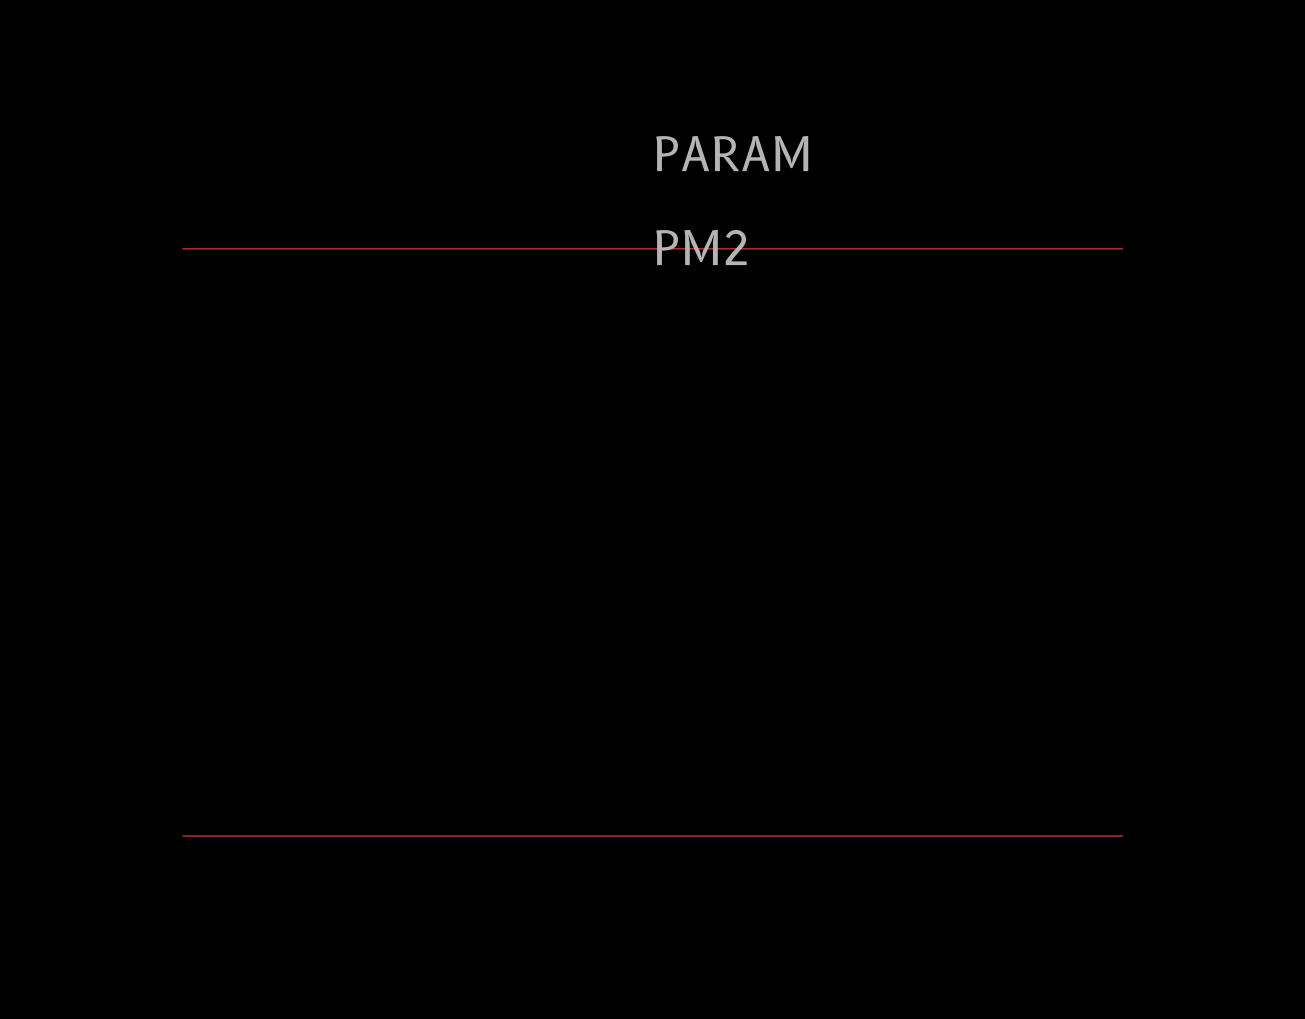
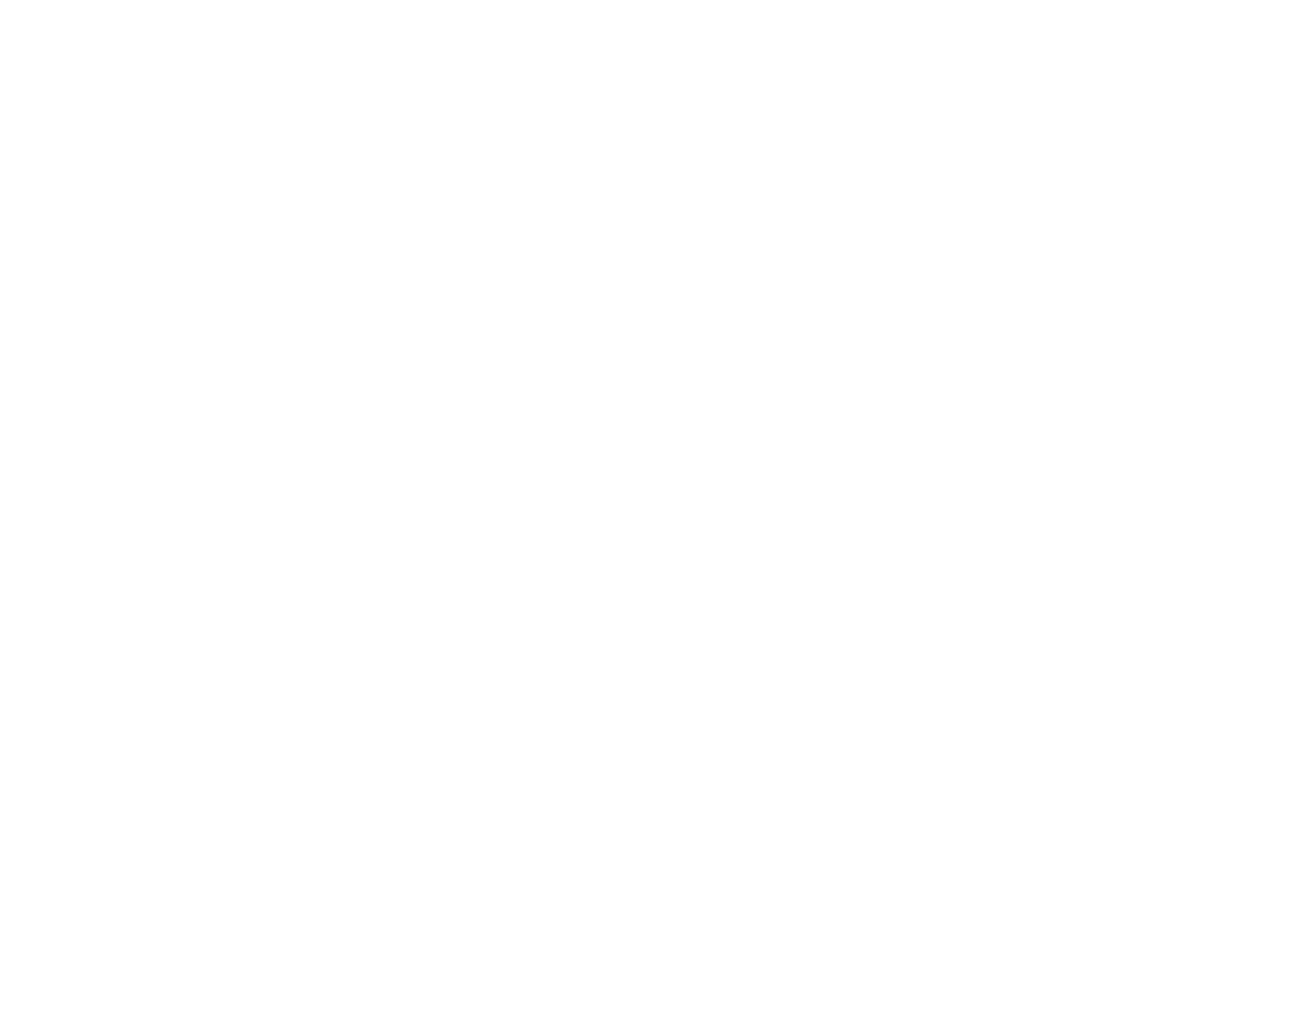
PM2: PARAM (652, 248) -> none
part: (652, 836) -> none

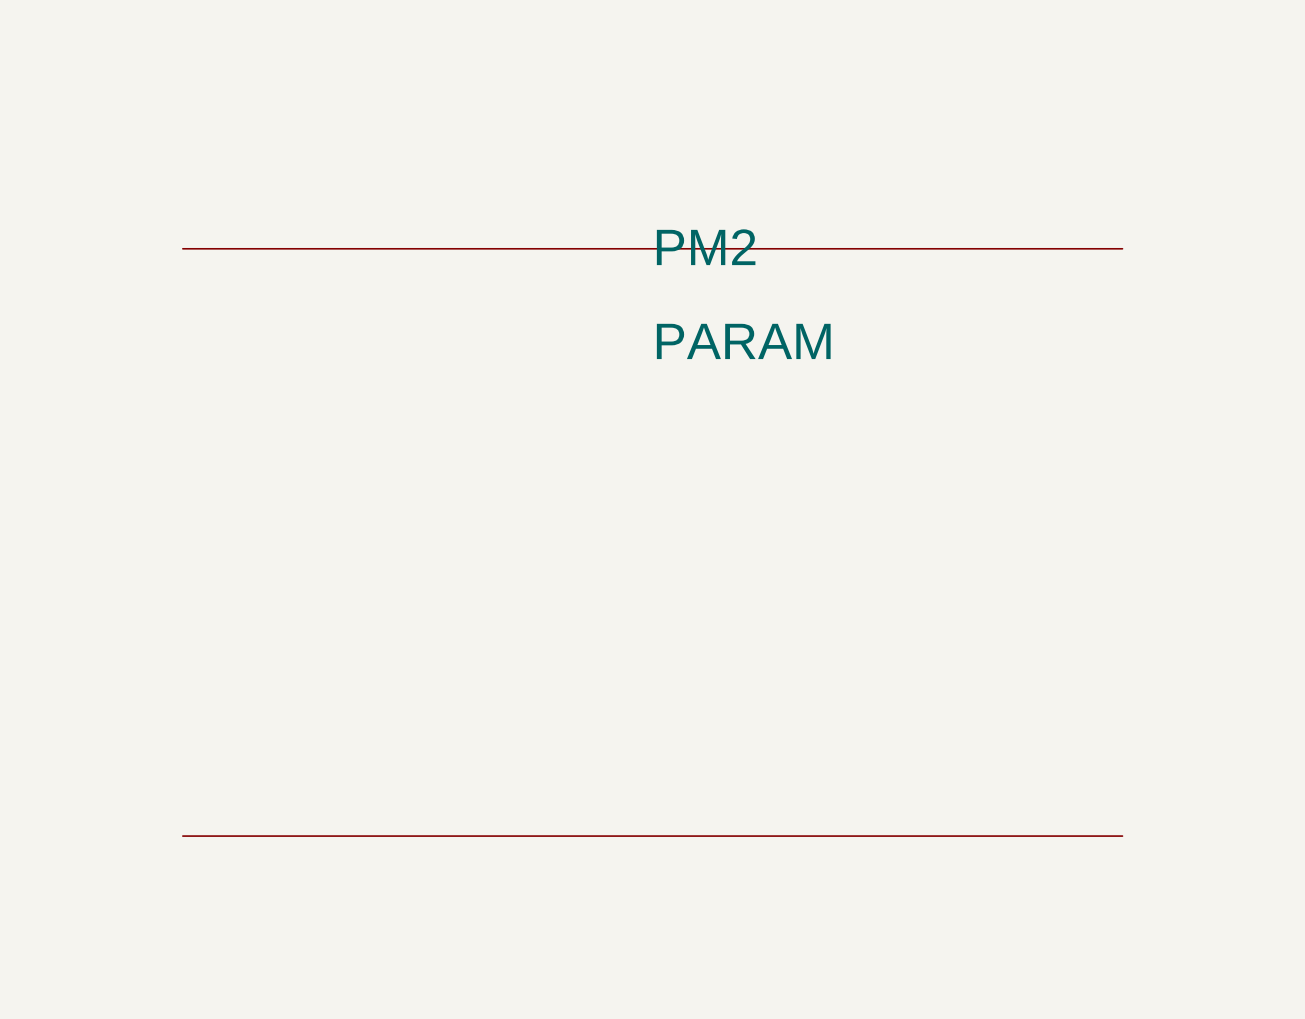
PM2: none -> PARAM (652, 248)
part: none -> (652, 836)

